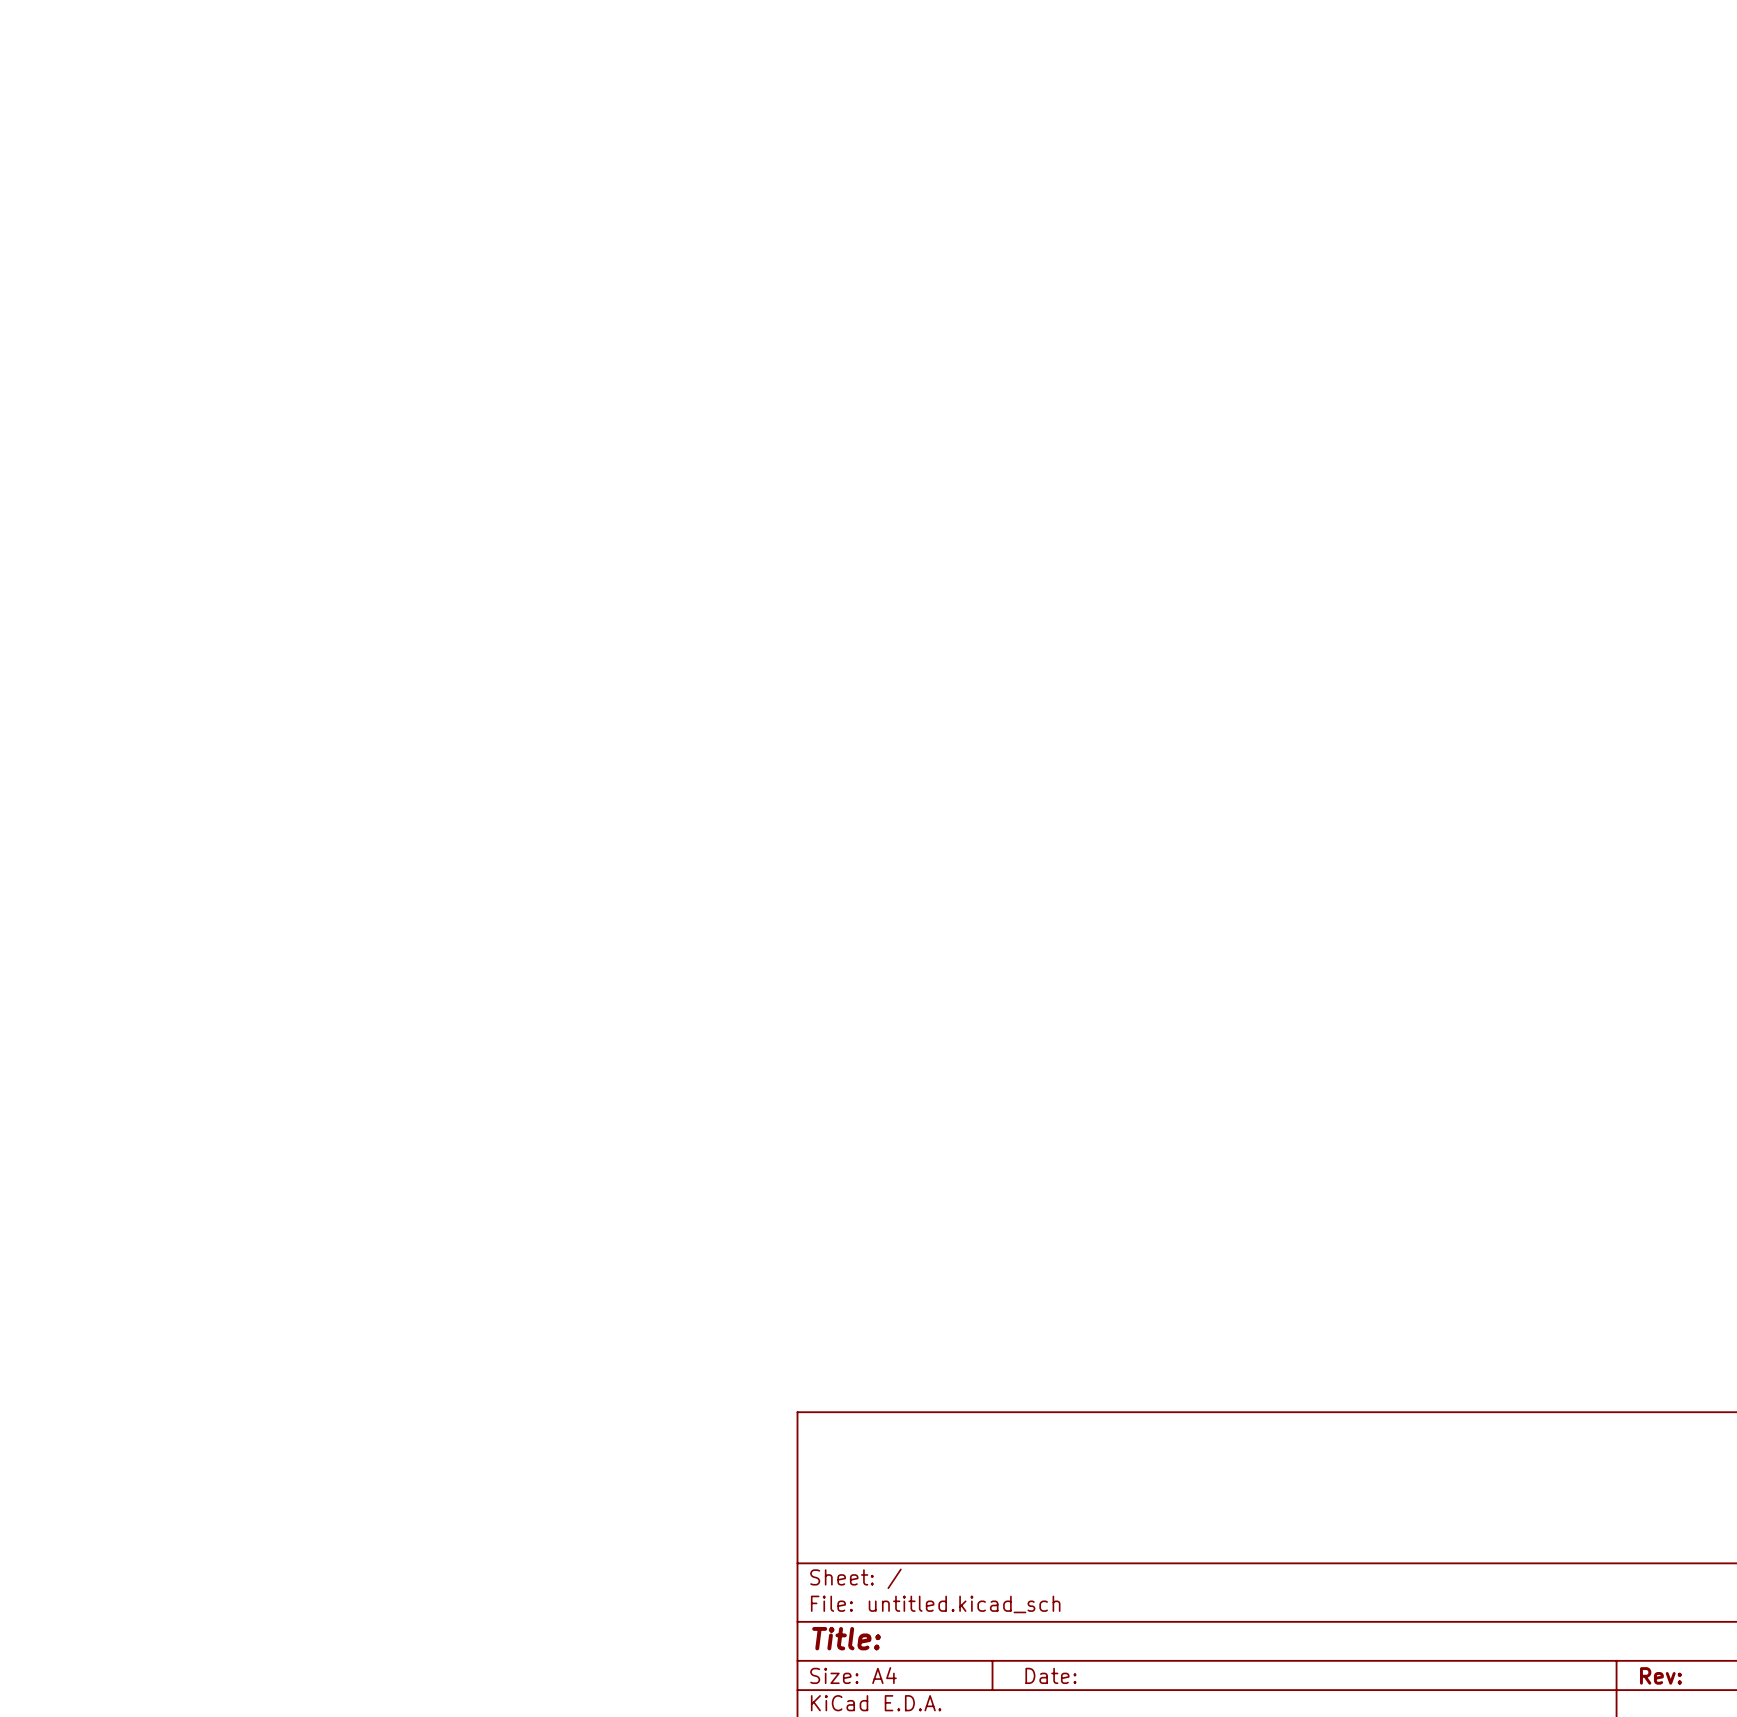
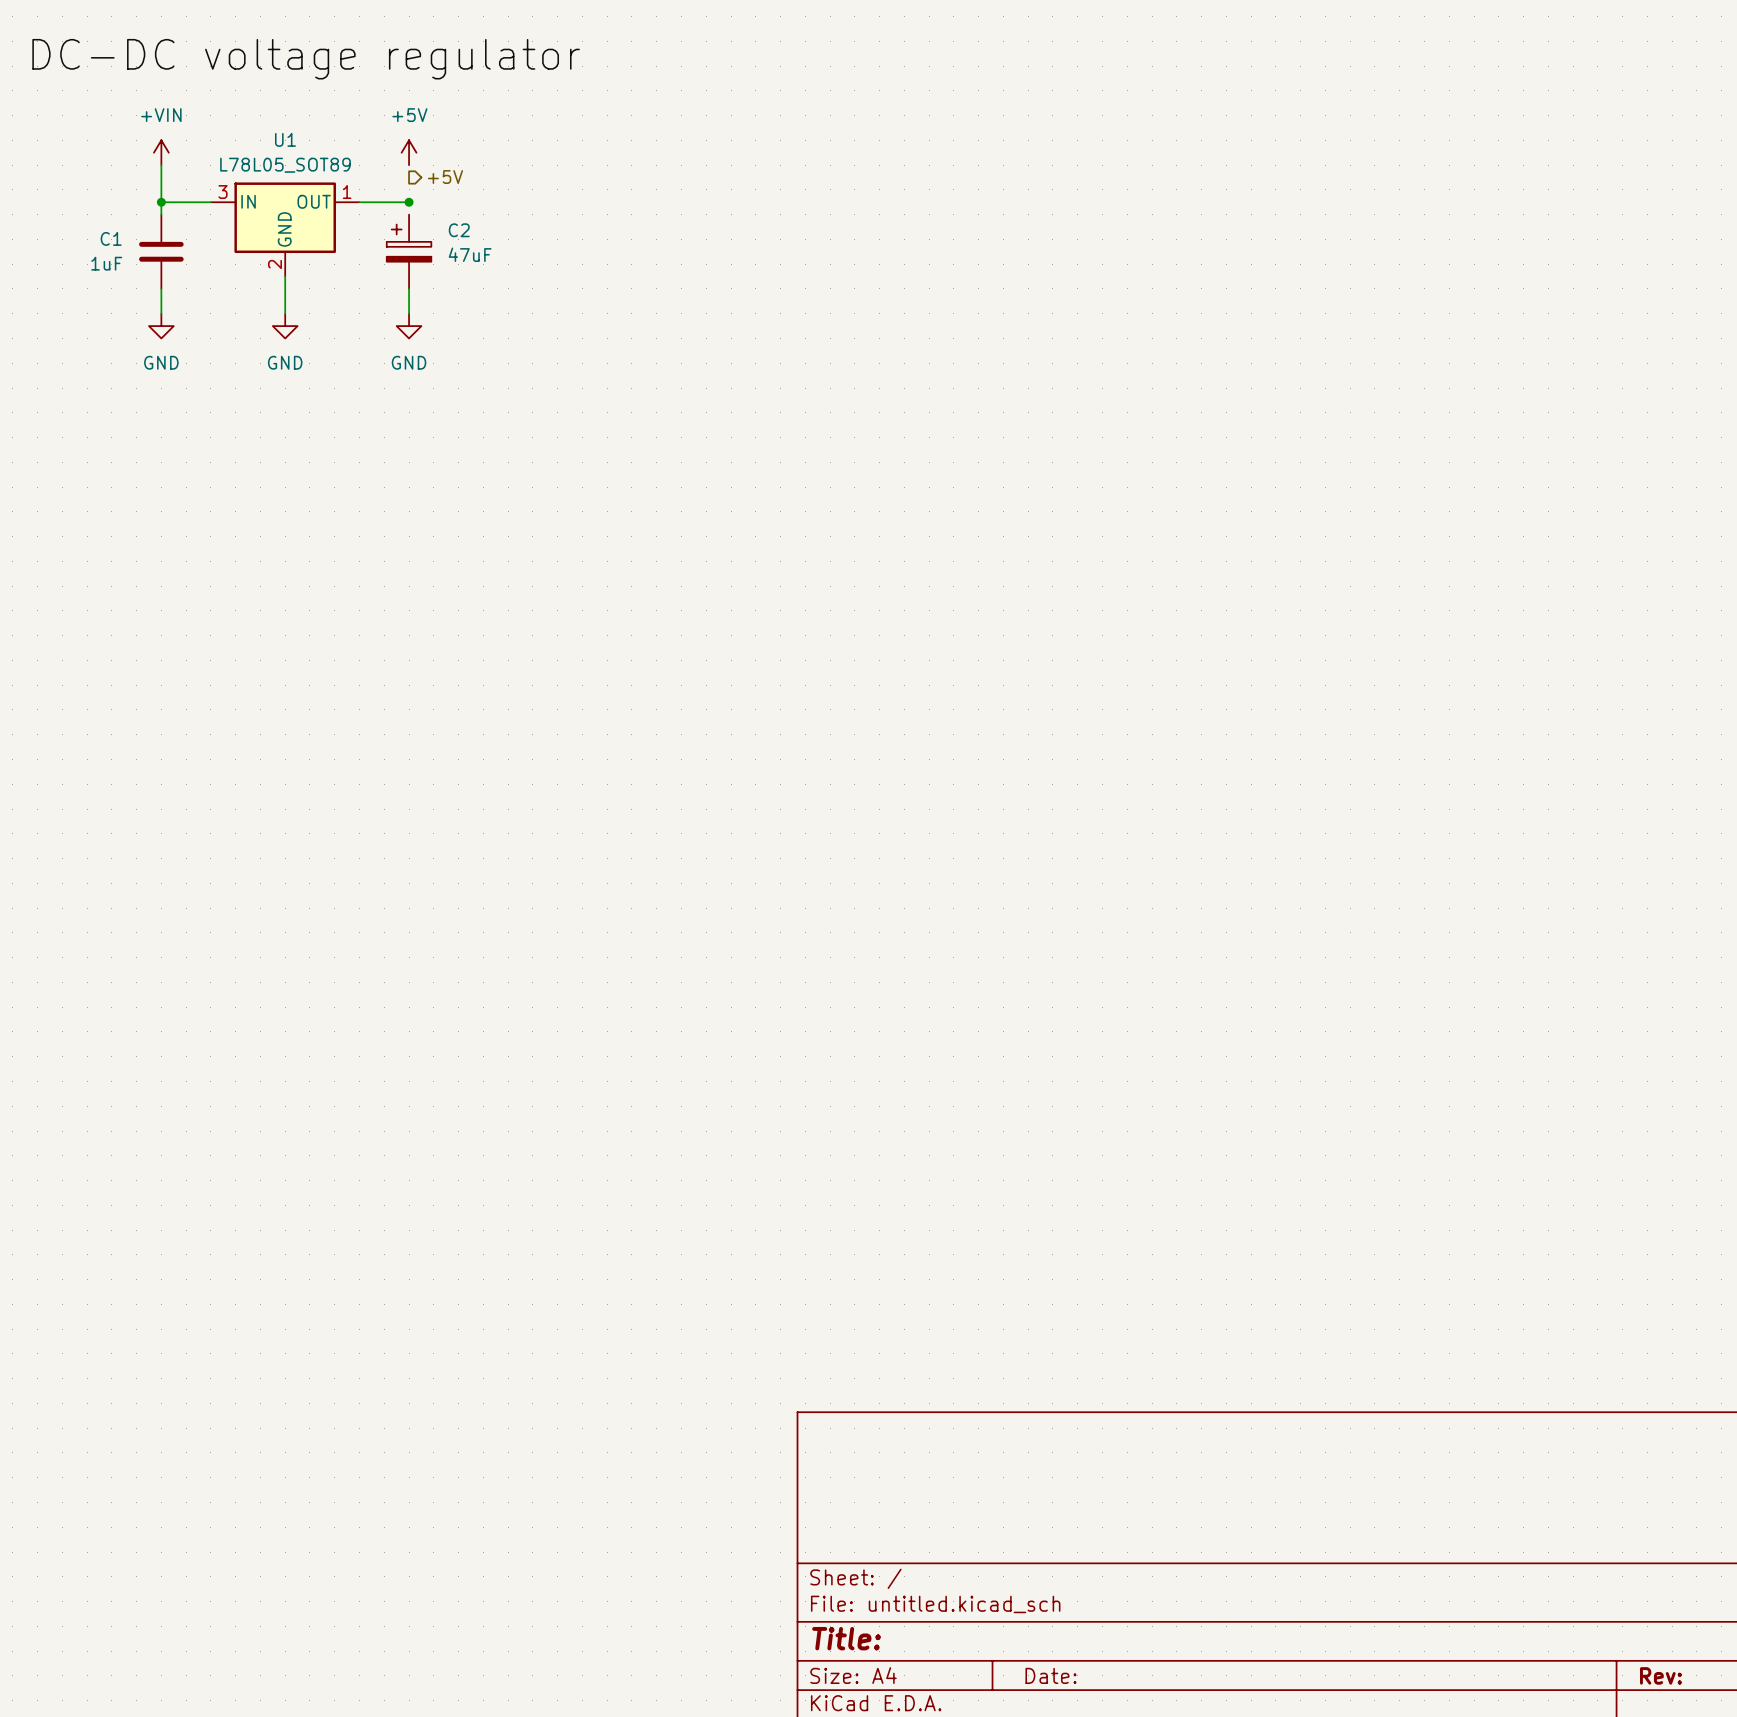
label: none -> DC-DC voltage regulator (306, 59)
power symbol: none -> +VIN (161, 152)
power symbol: none -> +5V (409, 152)
wire: none -> (161, 165) (161, 214)
hierarchical label: none -> +5V (445, 177)
wire: none -> (161, 202) (210, 202)
junction: none -> (161, 202)
wire: none -> (359, 202) (409, 202)
junction: none -> (409, 202)
U1: none -> L78L05_SOT89 (285, 229)
C1: none -> 1uF (161, 251)
C2: none -> 47uF (409, 251)
wire: none -> (285, 276) (285, 313)
wire: none -> (161, 288) (161, 313)
wire: none -> (409, 288) (409, 313)
power symbol: none -> GND (161, 326)
power symbol: none -> GND (285, 326)
power symbol: none -> GND (409, 326)

